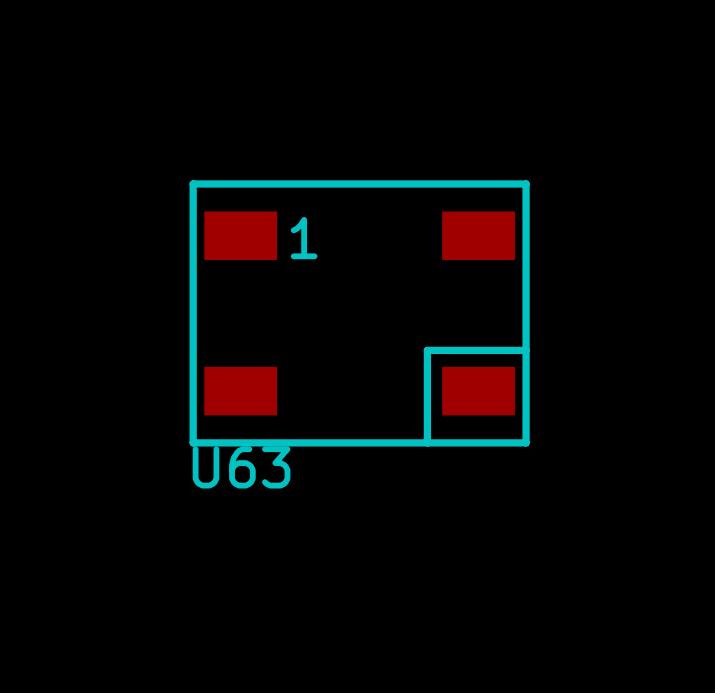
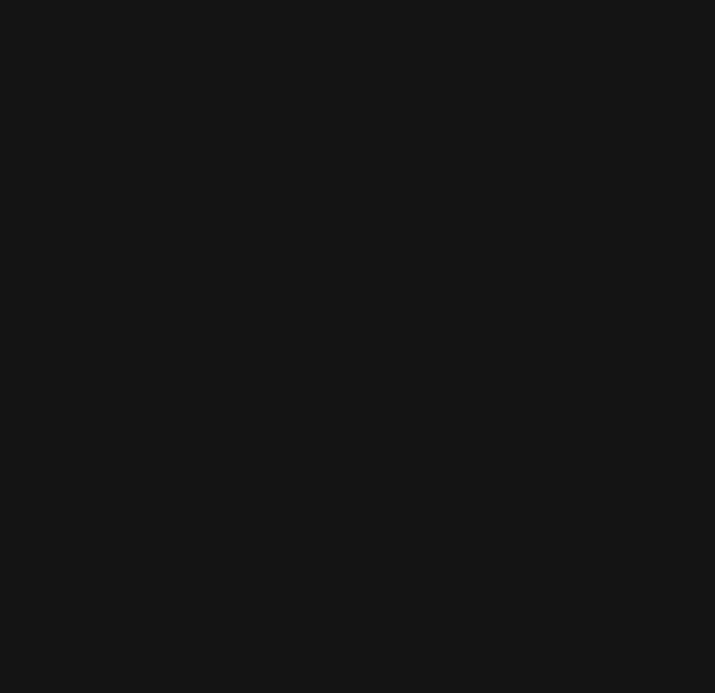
U63: (359, 313) -> none

